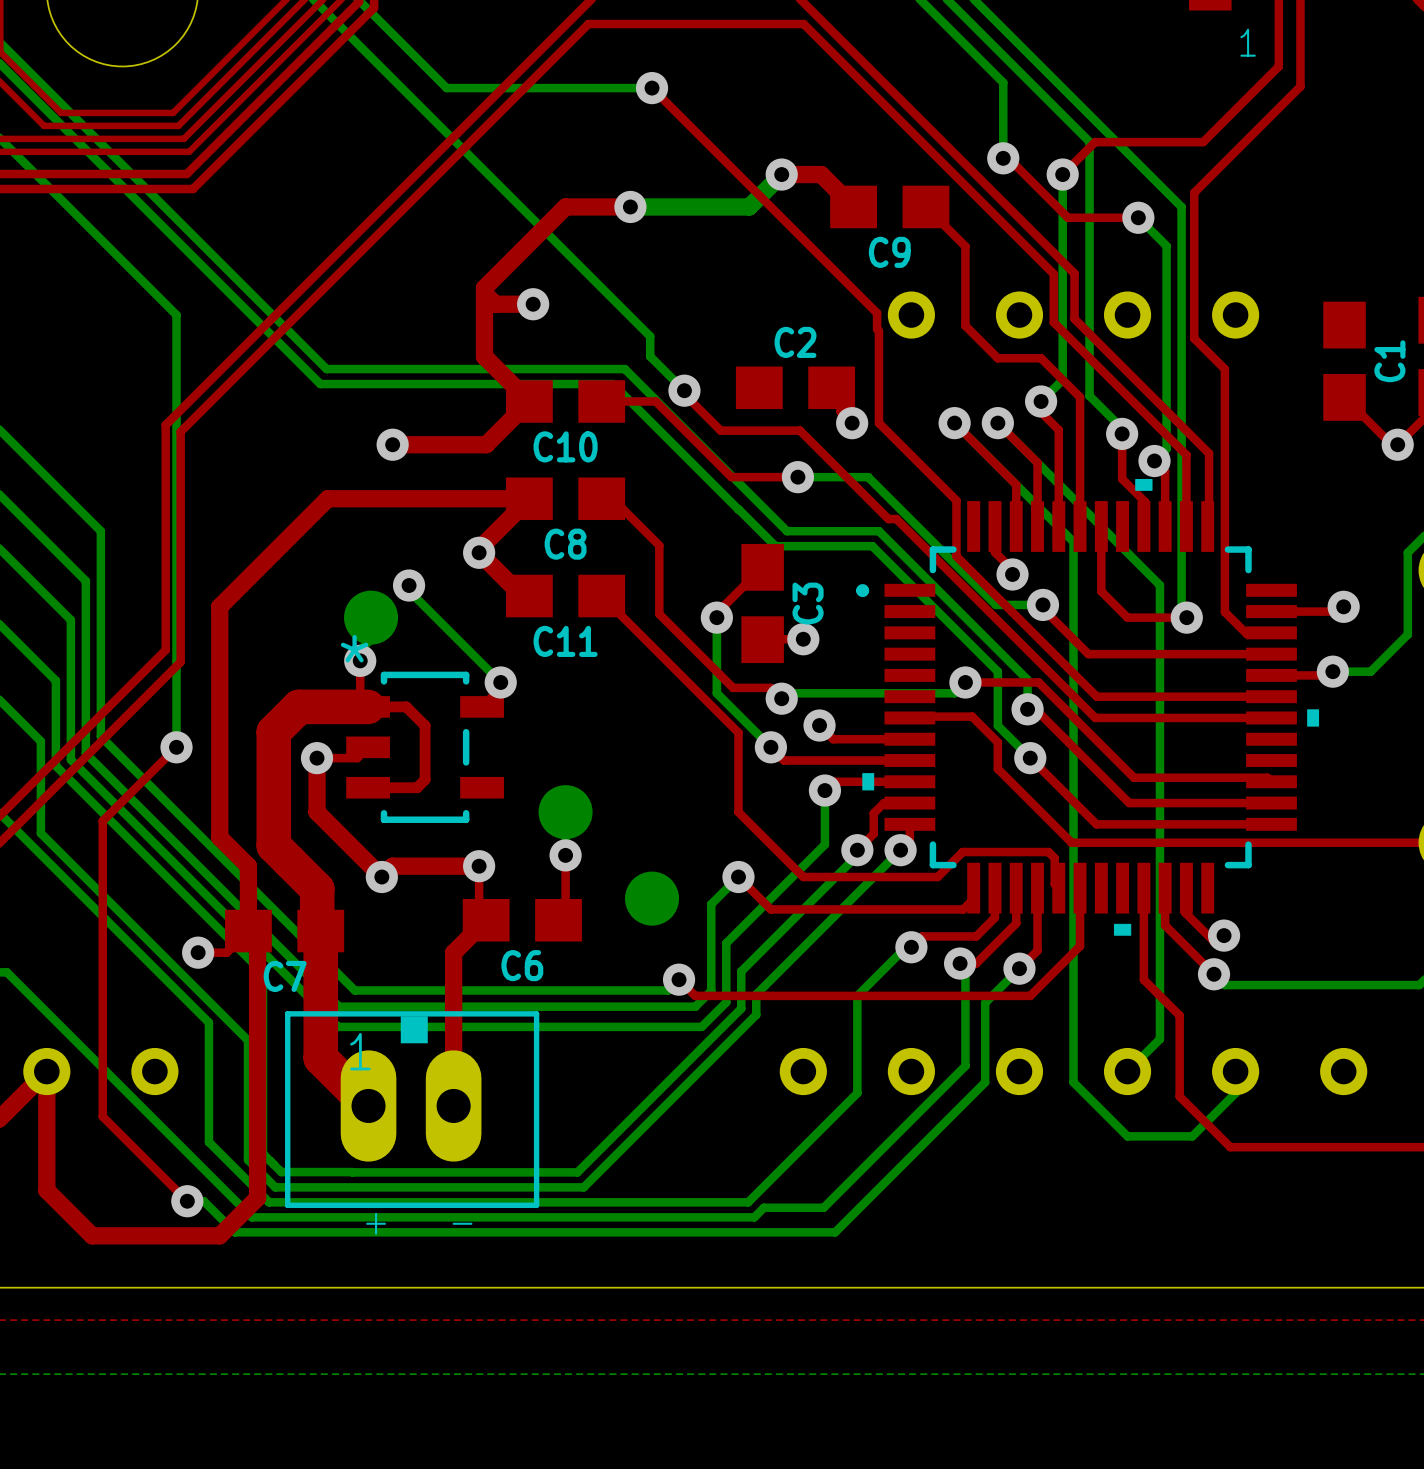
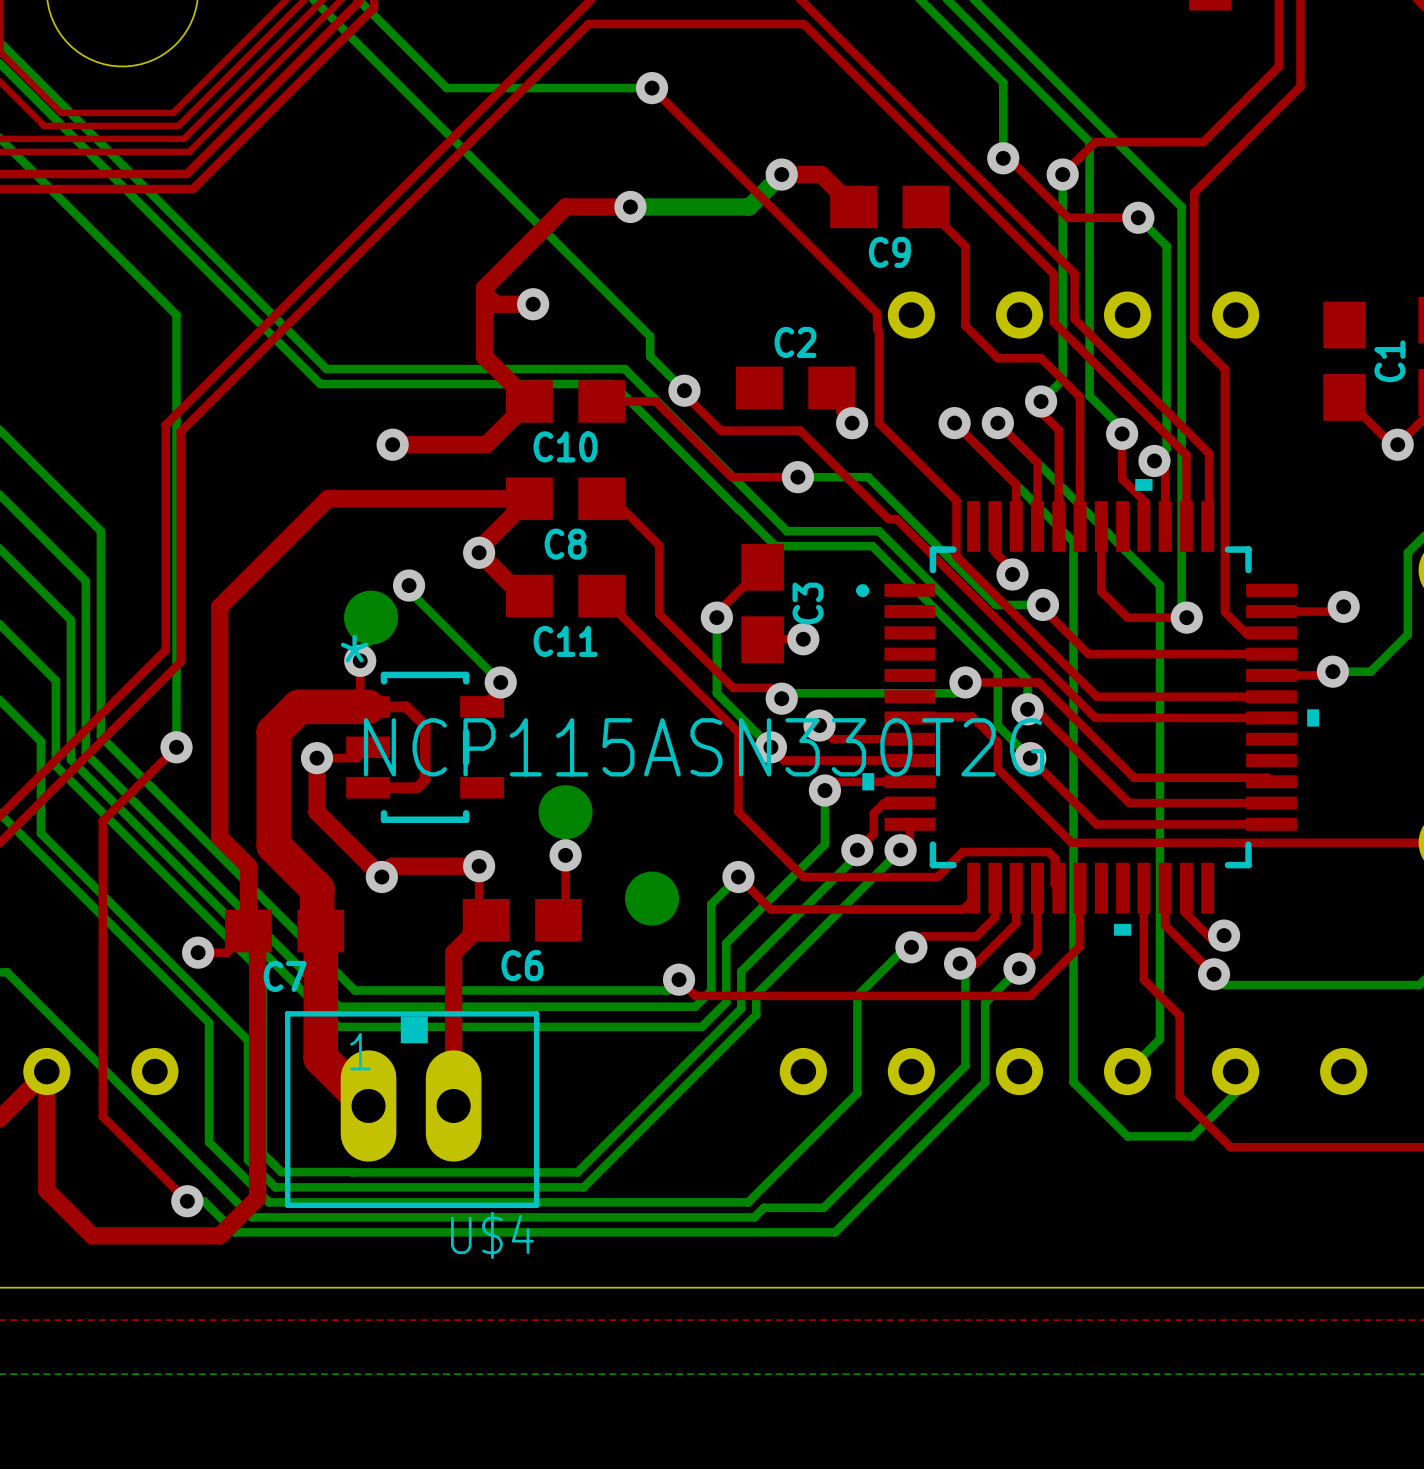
text: 1 (1248, 42) -> none
part value: none -> NCP115ASN330T2G (704, 747)
text: + (376, 1223) -> none
text: - (462, 1223) -> none
U$4 name: none -> U$4 (492, 1235)

